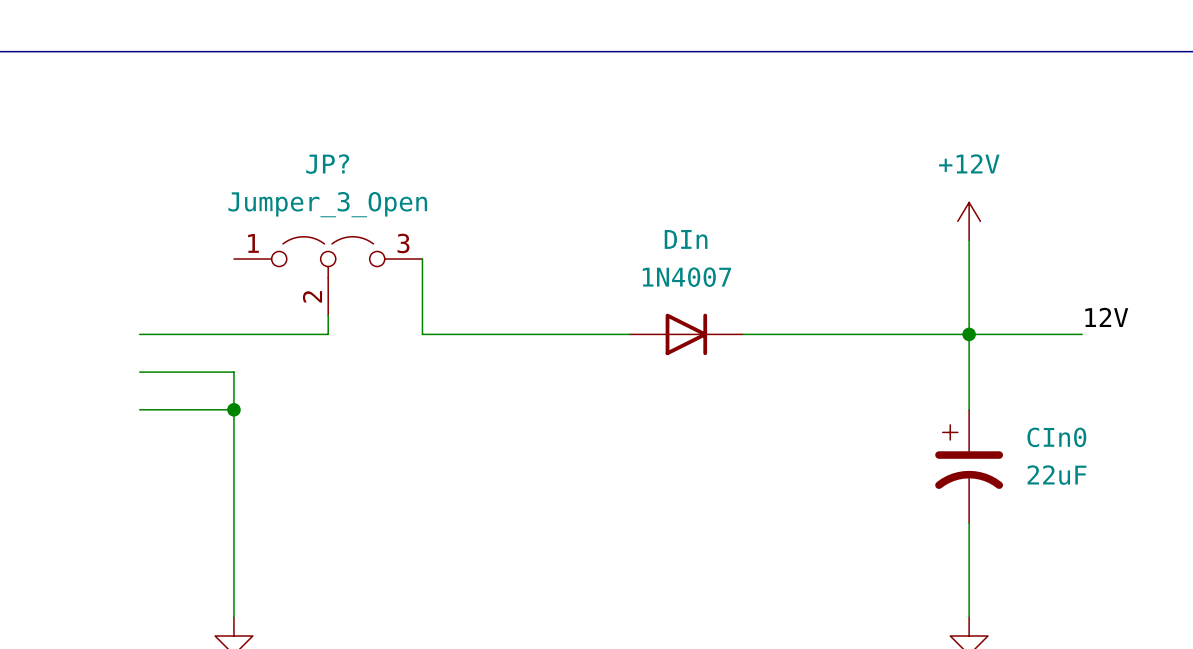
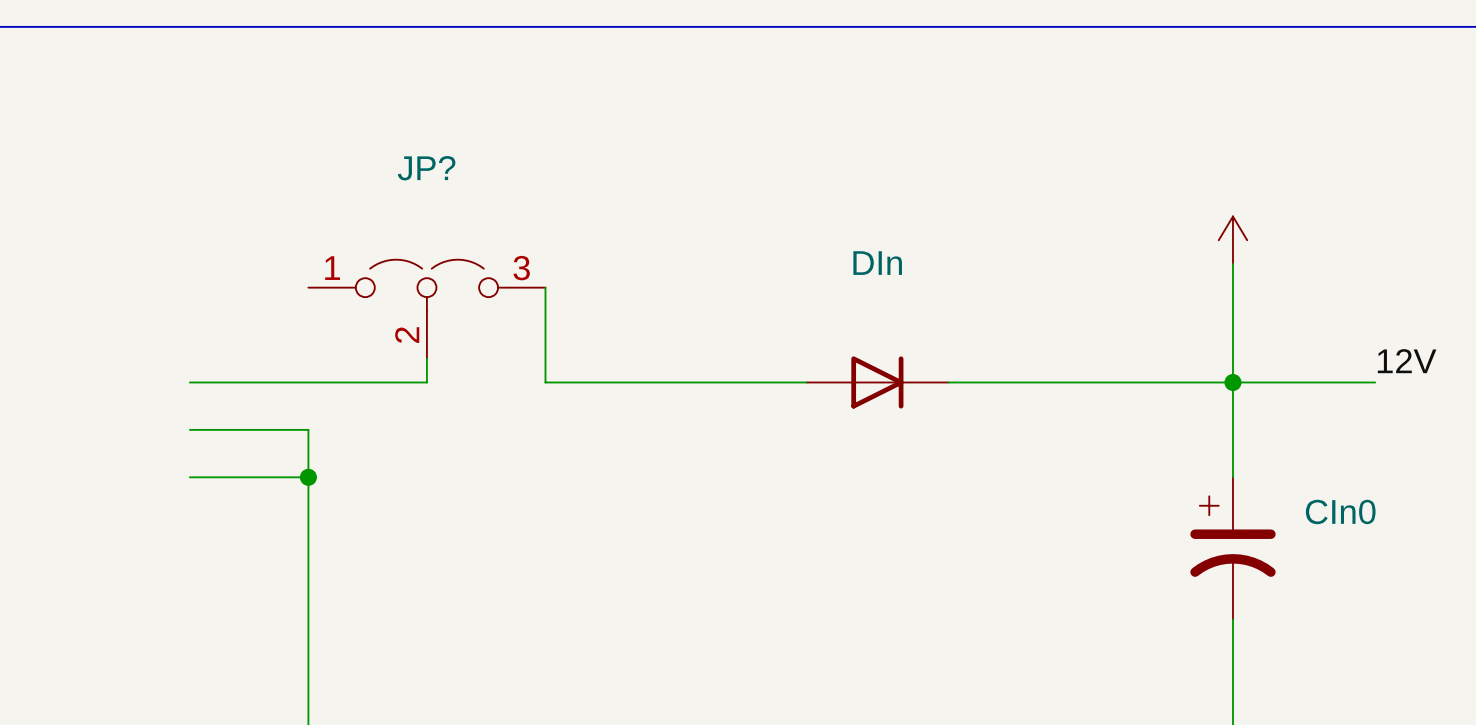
power symbol text: +12V (969, 163) -> none
JP? value: Jumper_3_Open (327, 204) -> none
DIn value: 1N4007 (686, 277) -> none
CIn0 value: 22uF (1056, 475) -> none

